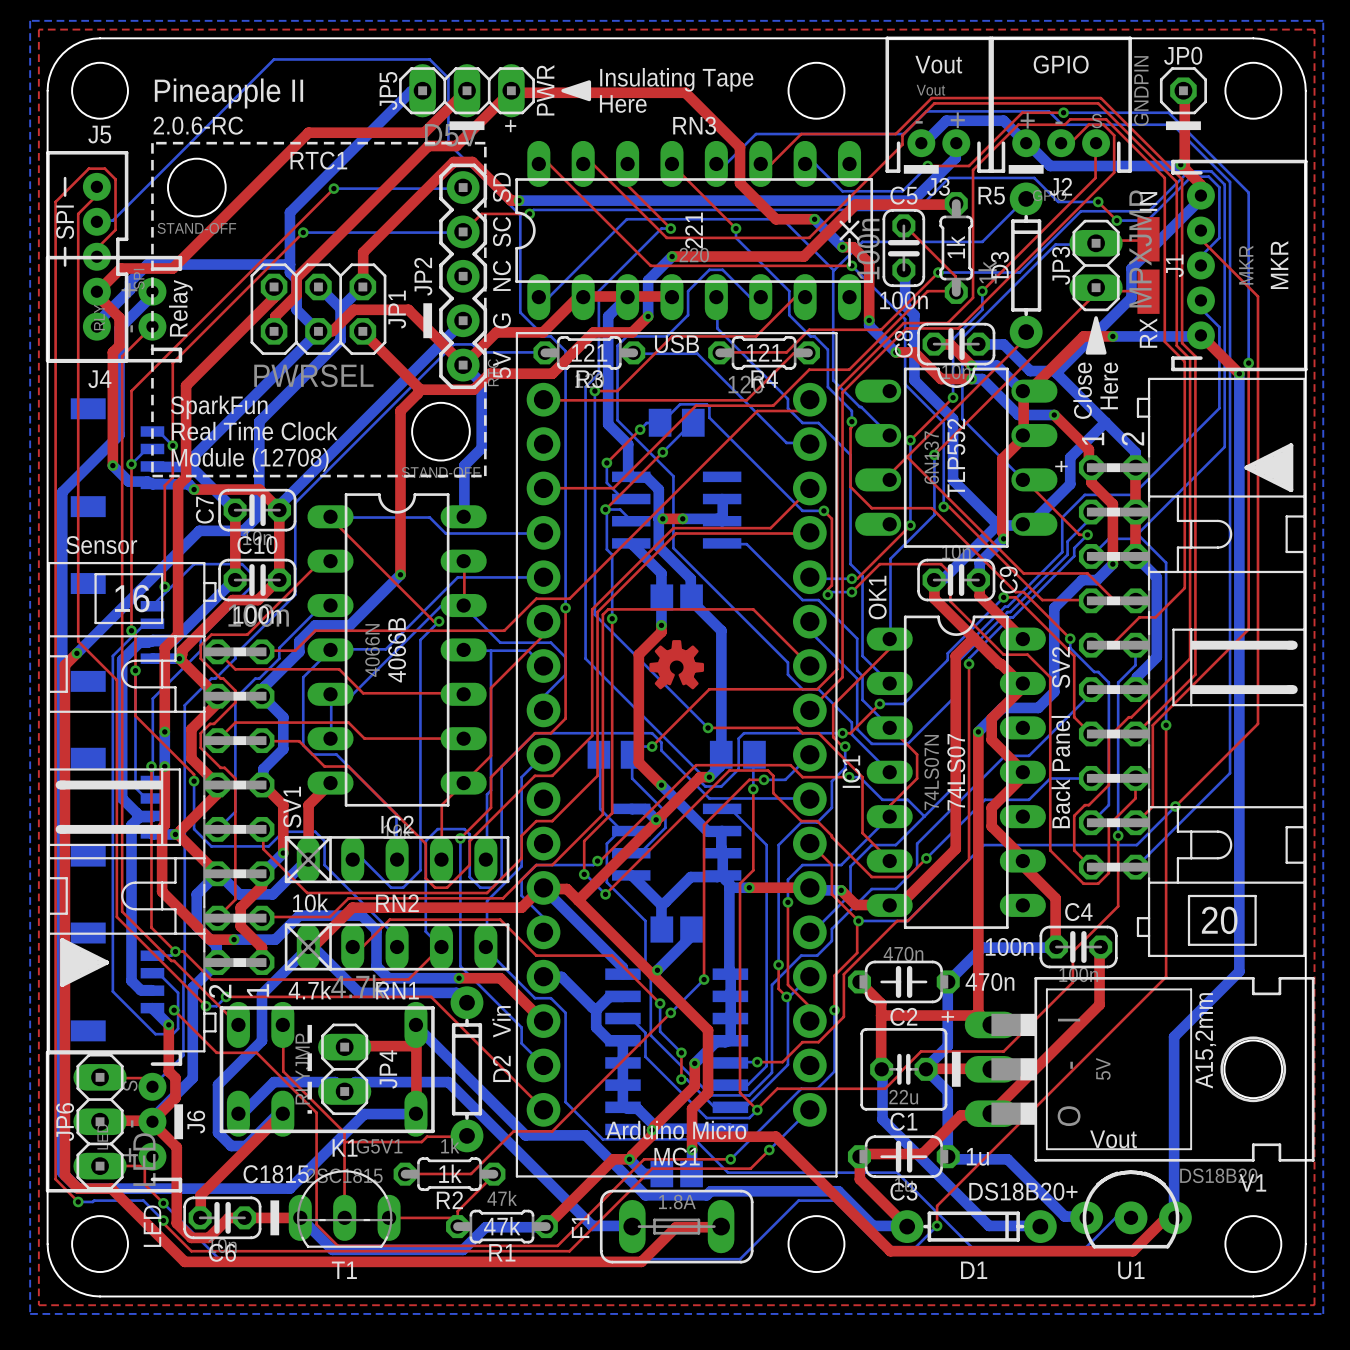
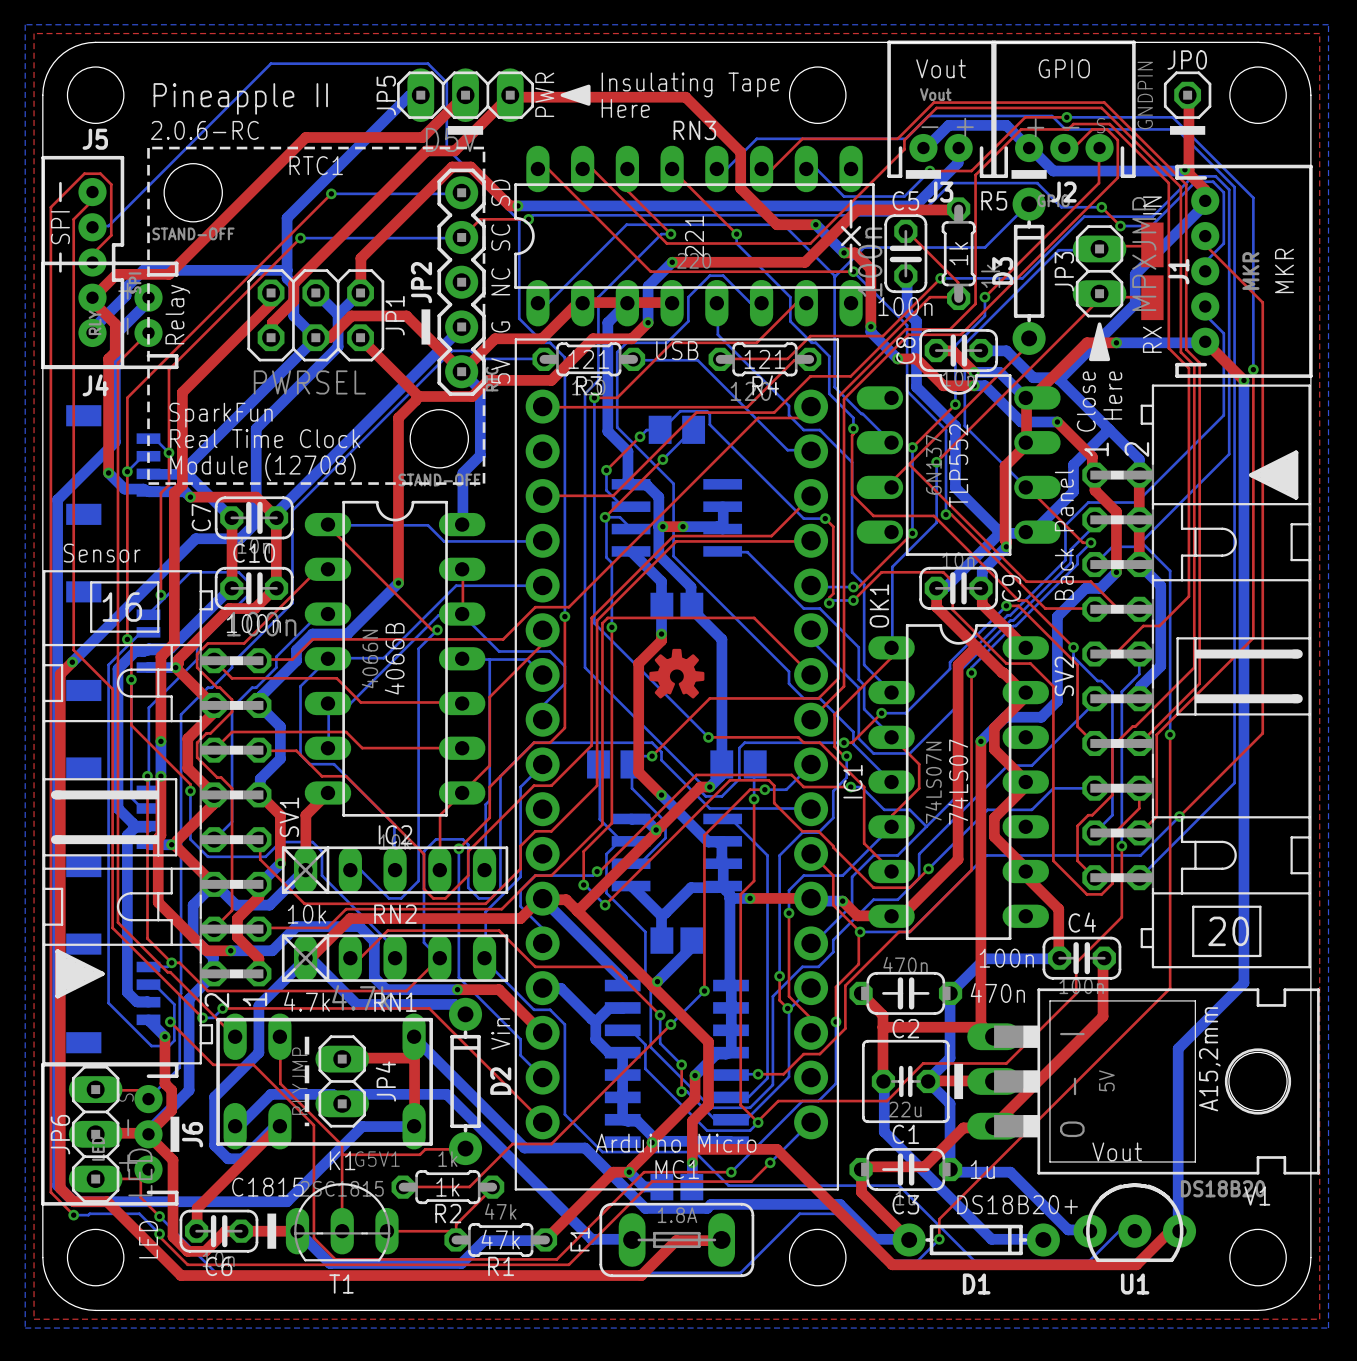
text: + (510, 125) -> none
text: + (1061, 466) -> none
text position: Back Panel (1060, 772) -> Back Panel (1064, 534)
text: + (947, 1016) -> none

